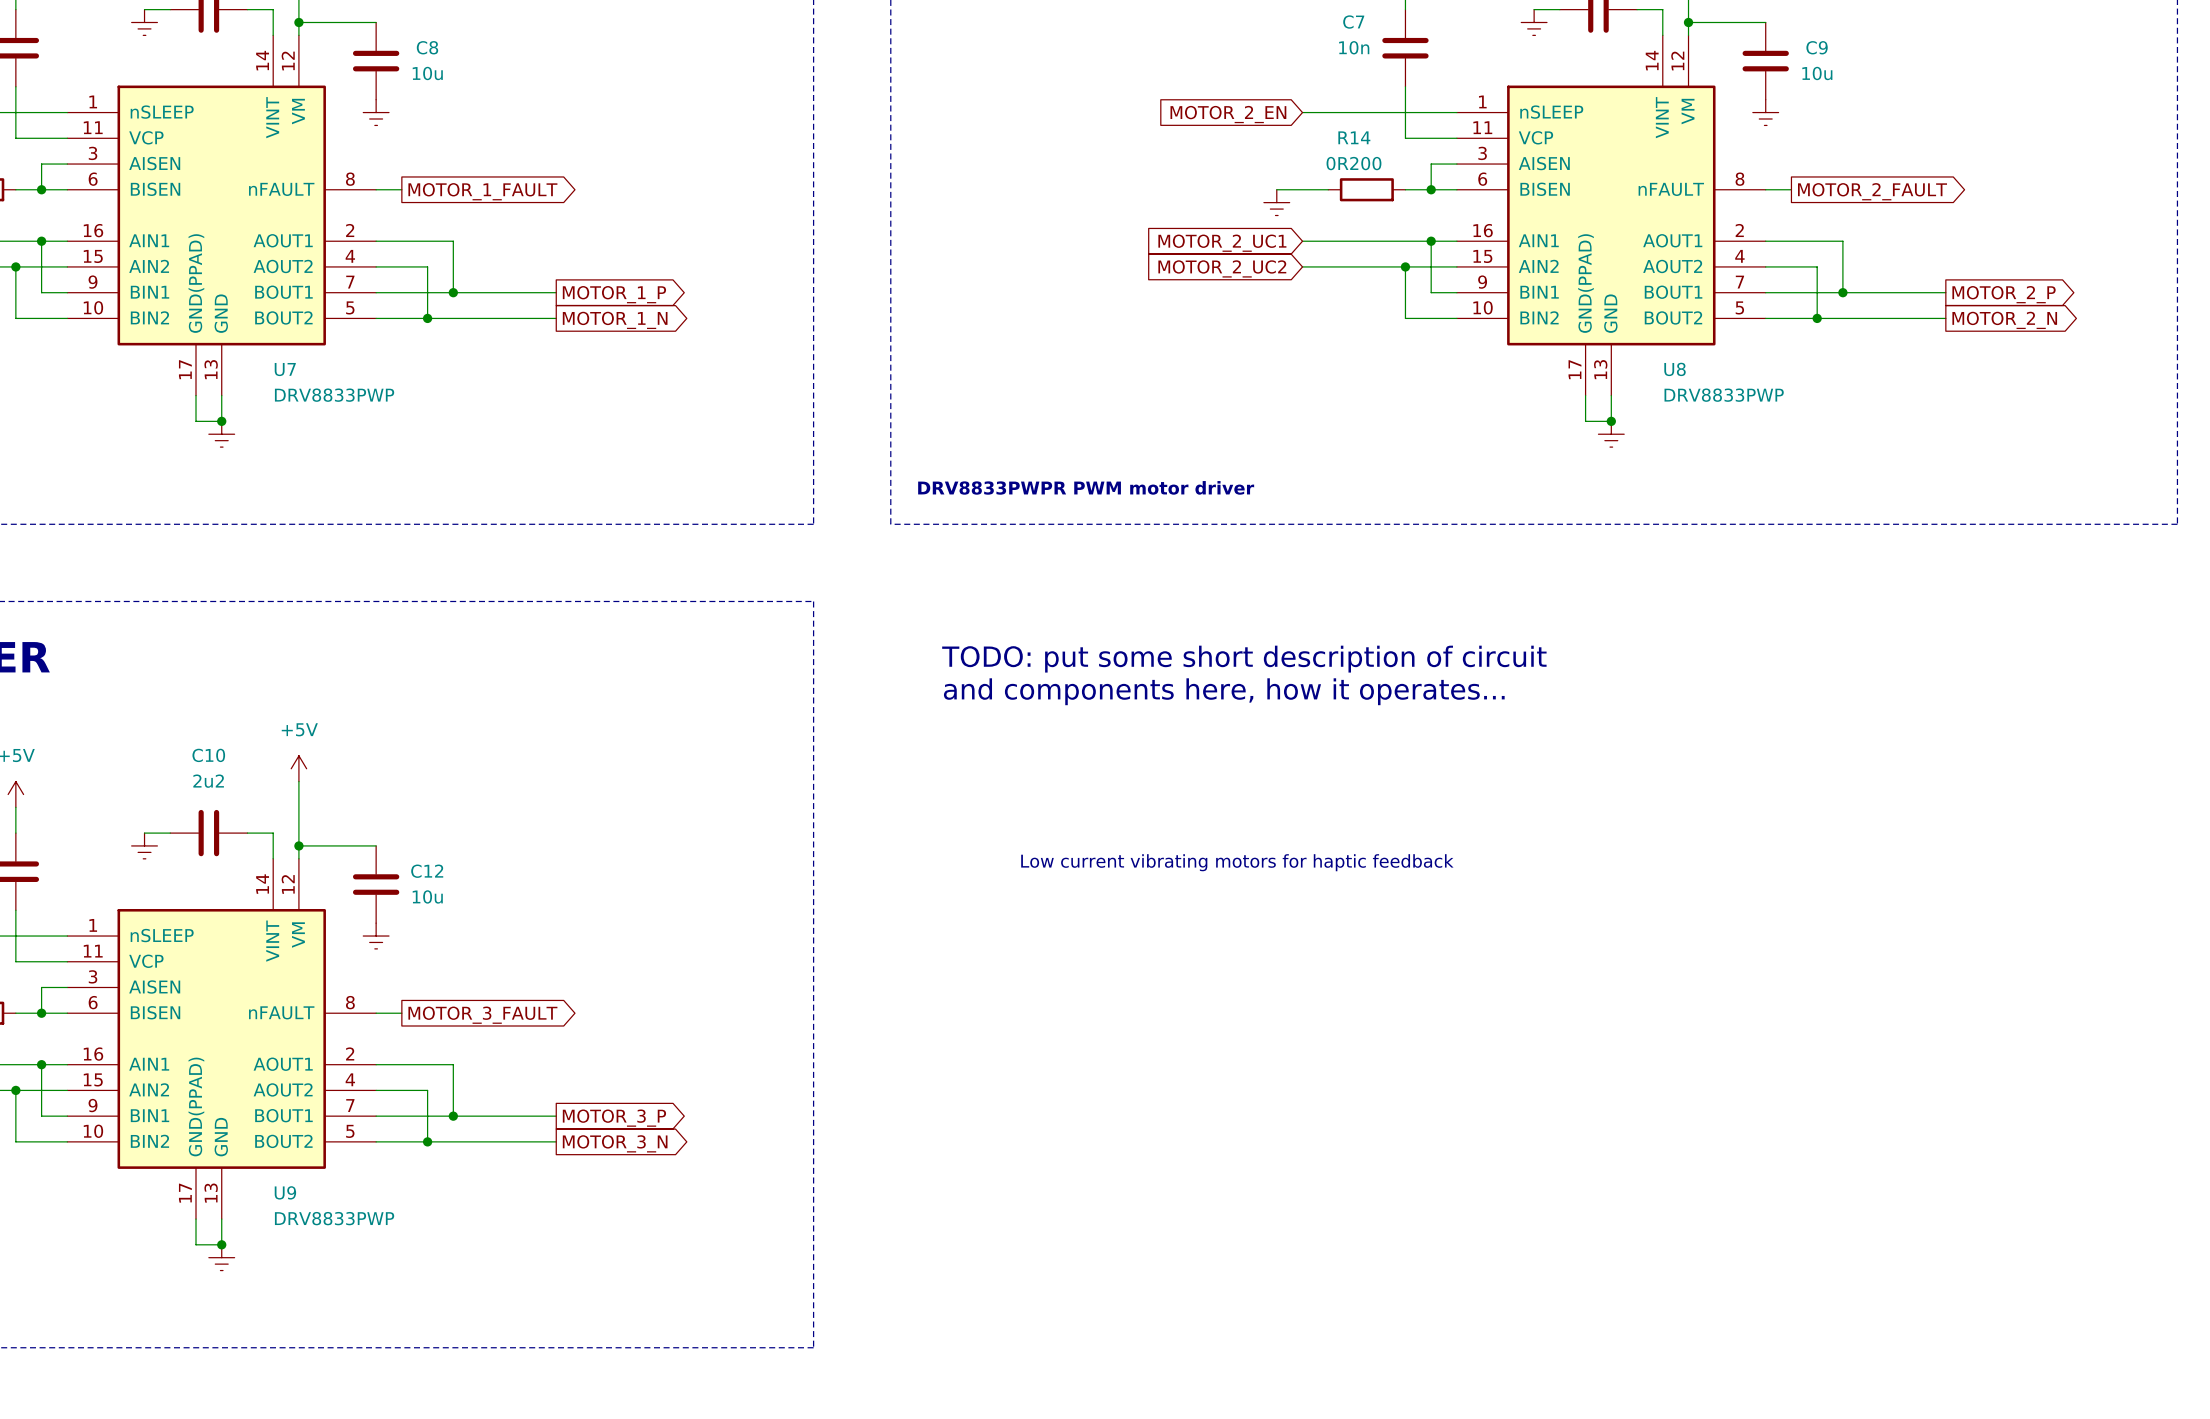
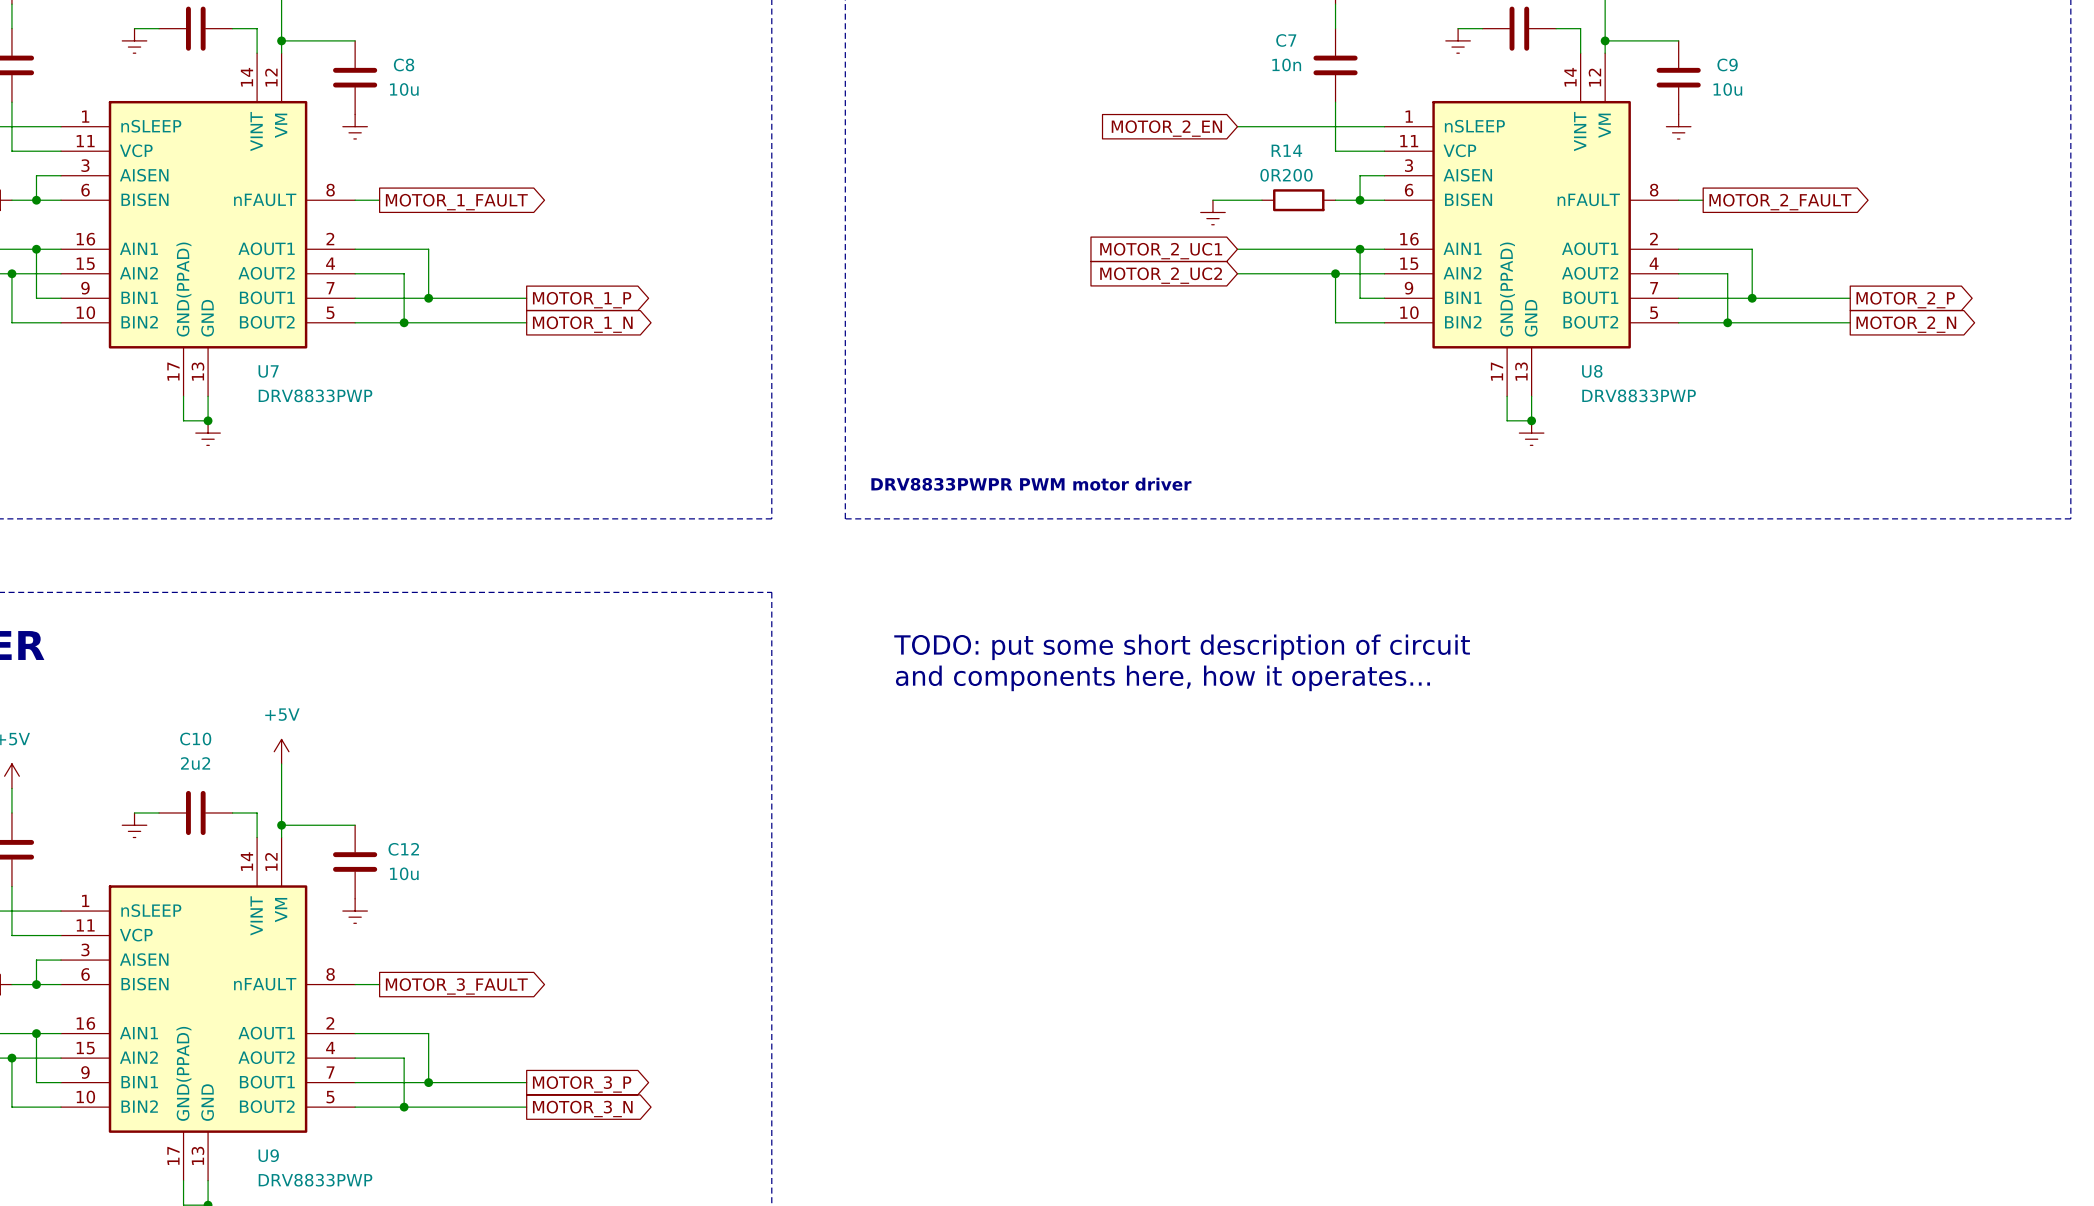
text: Low current vibrating motors for haptic feedback (1237, 862) -> none

